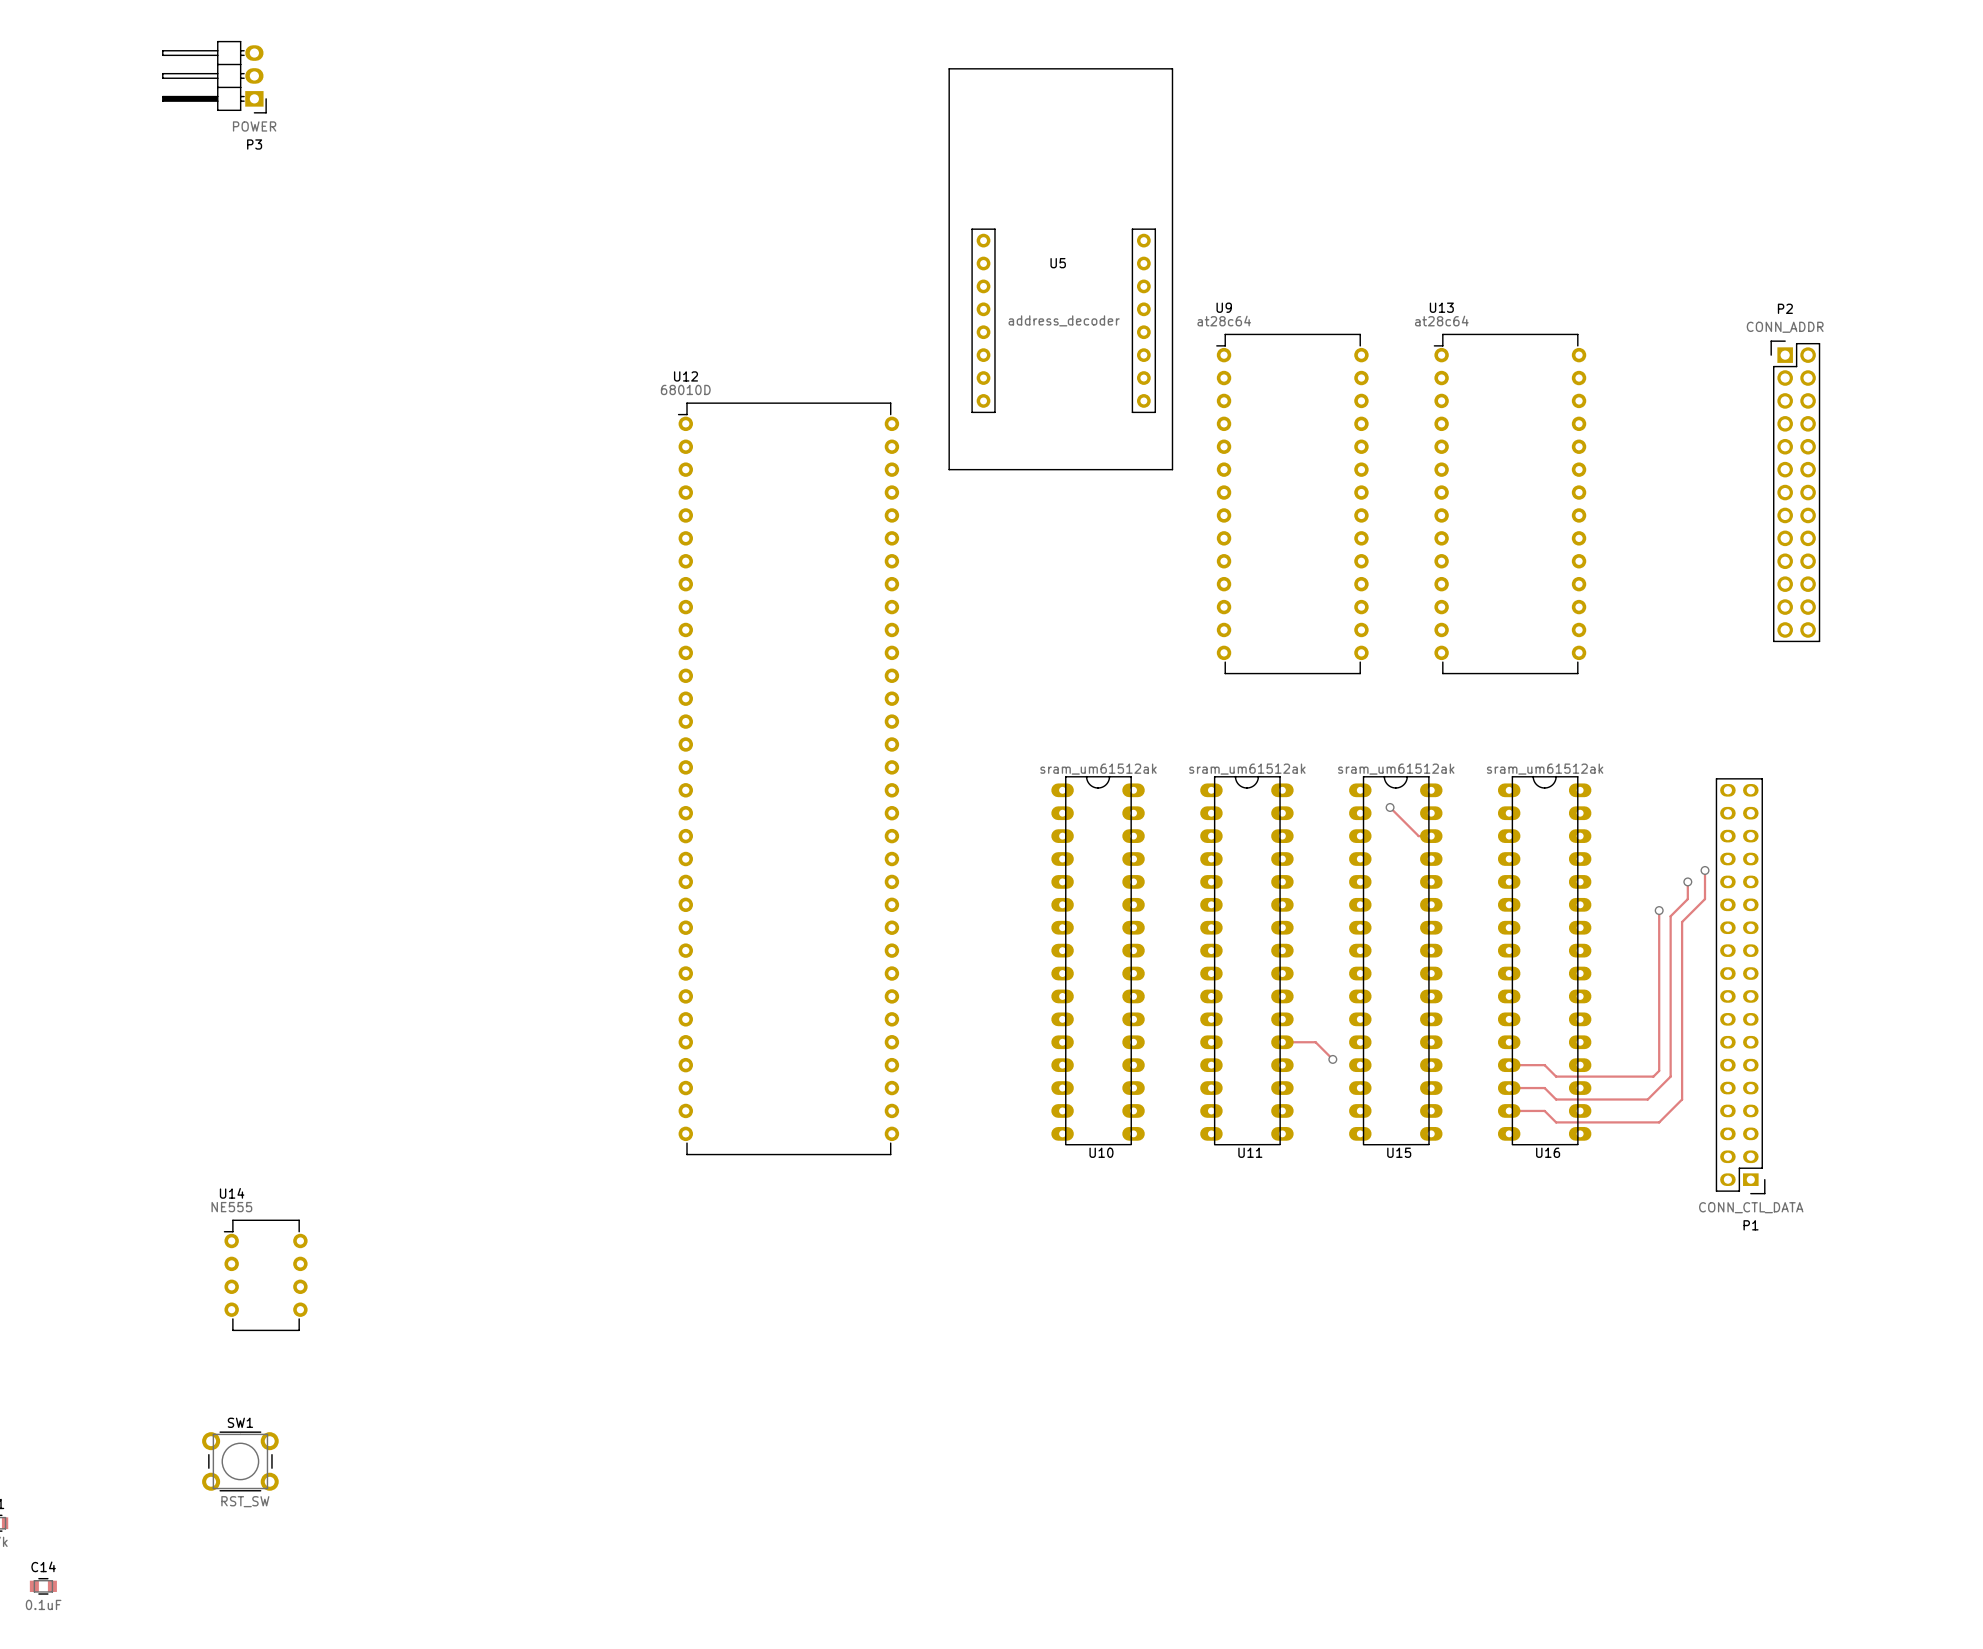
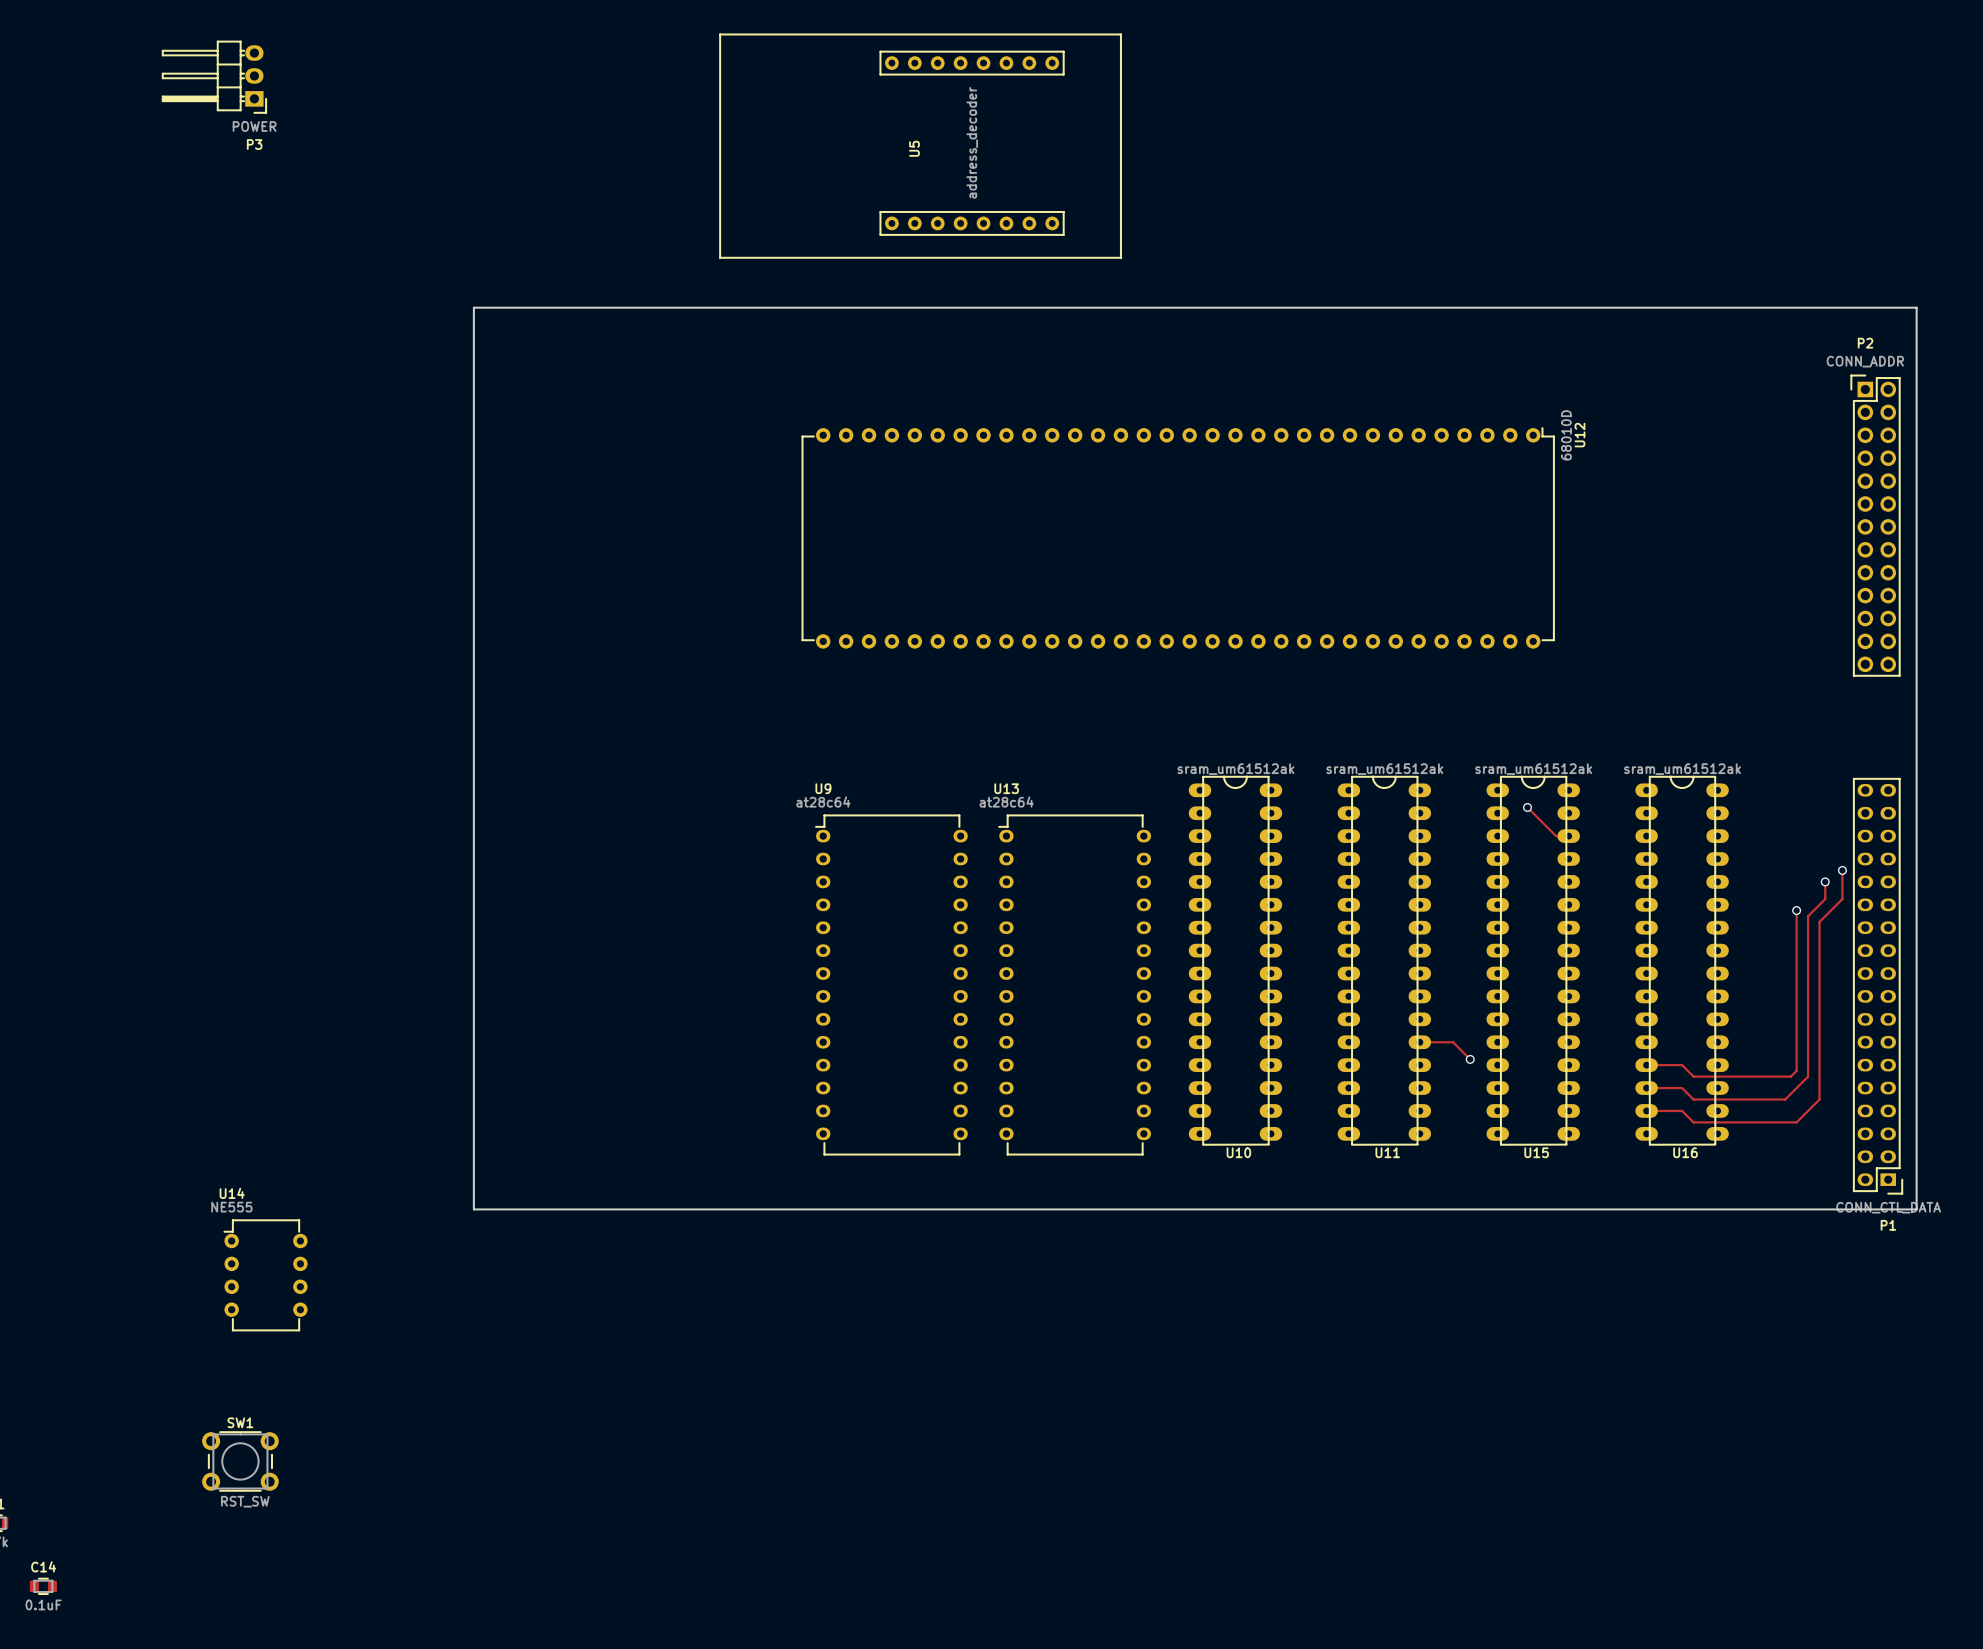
U5 rotation: 0° (1060, 269) -> 90° counterclockwise (920, 146)
board edge: none -> (473, 307) (473, 1209) (1916, 1209) (1916, 307) (473, 307)
U9 footprint: [1216, 333, 1369, 675] -> [815, 814, 968, 1156]
U13 footprint: [1433, 333, 1587, 675] -> [998, 814, 1152, 1156]
P2 position: (1795, 491) -> (1875, 525)
U12 rotation: 0° (788, 778) -> 90° clockwise (1178, 538)
U12 position: (788, 778) -> (1178, 538)
track: (1390, 807) (1418, 836) (1431, 836) -> (1527, 807) (1556, 836) (1568, 836)
via: (1390, 807) -> none
via: none -> (1527, 807)
track: (1705, 870) (1705, 899) (1682, 922) (1682, 1099) (1659, 1122) (1556, 1122) (1544, 1110) (1509, 1110) -> (1842, 870) (1842, 899) (1819, 922) (1819, 1099) (1796, 1122) (1693, 1122) (1682, 1110) (1646, 1110)
via: (1705, 870) -> none
via: none -> (1842, 870)
track: (1687, 881) (1687, 899) (1670, 916) (1670, 1076) (1647, 1099) (1556, 1099) (1544, 1088) (1509, 1088) -> (1825, 881) (1825, 899) (1808, 916) (1808, 1076) (1785, 1099) (1693, 1099) (1682, 1088) (1646, 1088)
via: (1687, 881) -> none
via: none -> (1825, 881)
track: (1659, 910) (1659, 1070) (1653, 1076) (1556, 1076) (1544, 1065) (1509, 1065) -> (1796, 910) (1796, 1070) (1790, 1076) (1693, 1076) (1682, 1065) (1646, 1065)
via: (1659, 910) -> none
via: none -> (1796, 910)
U10 position: (1098, 960) -> (1235, 960)
U11 position: (1246, 960) -> (1384, 960)
U15 position: (1395, 960) -> (1533, 960)
U16 position: (1544, 960) -> (1682, 960)
P1 position: (1740, 986) -> (1878, 986)
track: (1281, 1042) (1315, 1042) (1332, 1059) -> (1418, 1042) (1453, 1042) (1470, 1059)
via: (1332, 1059) -> none
via: none -> (1470, 1059)

